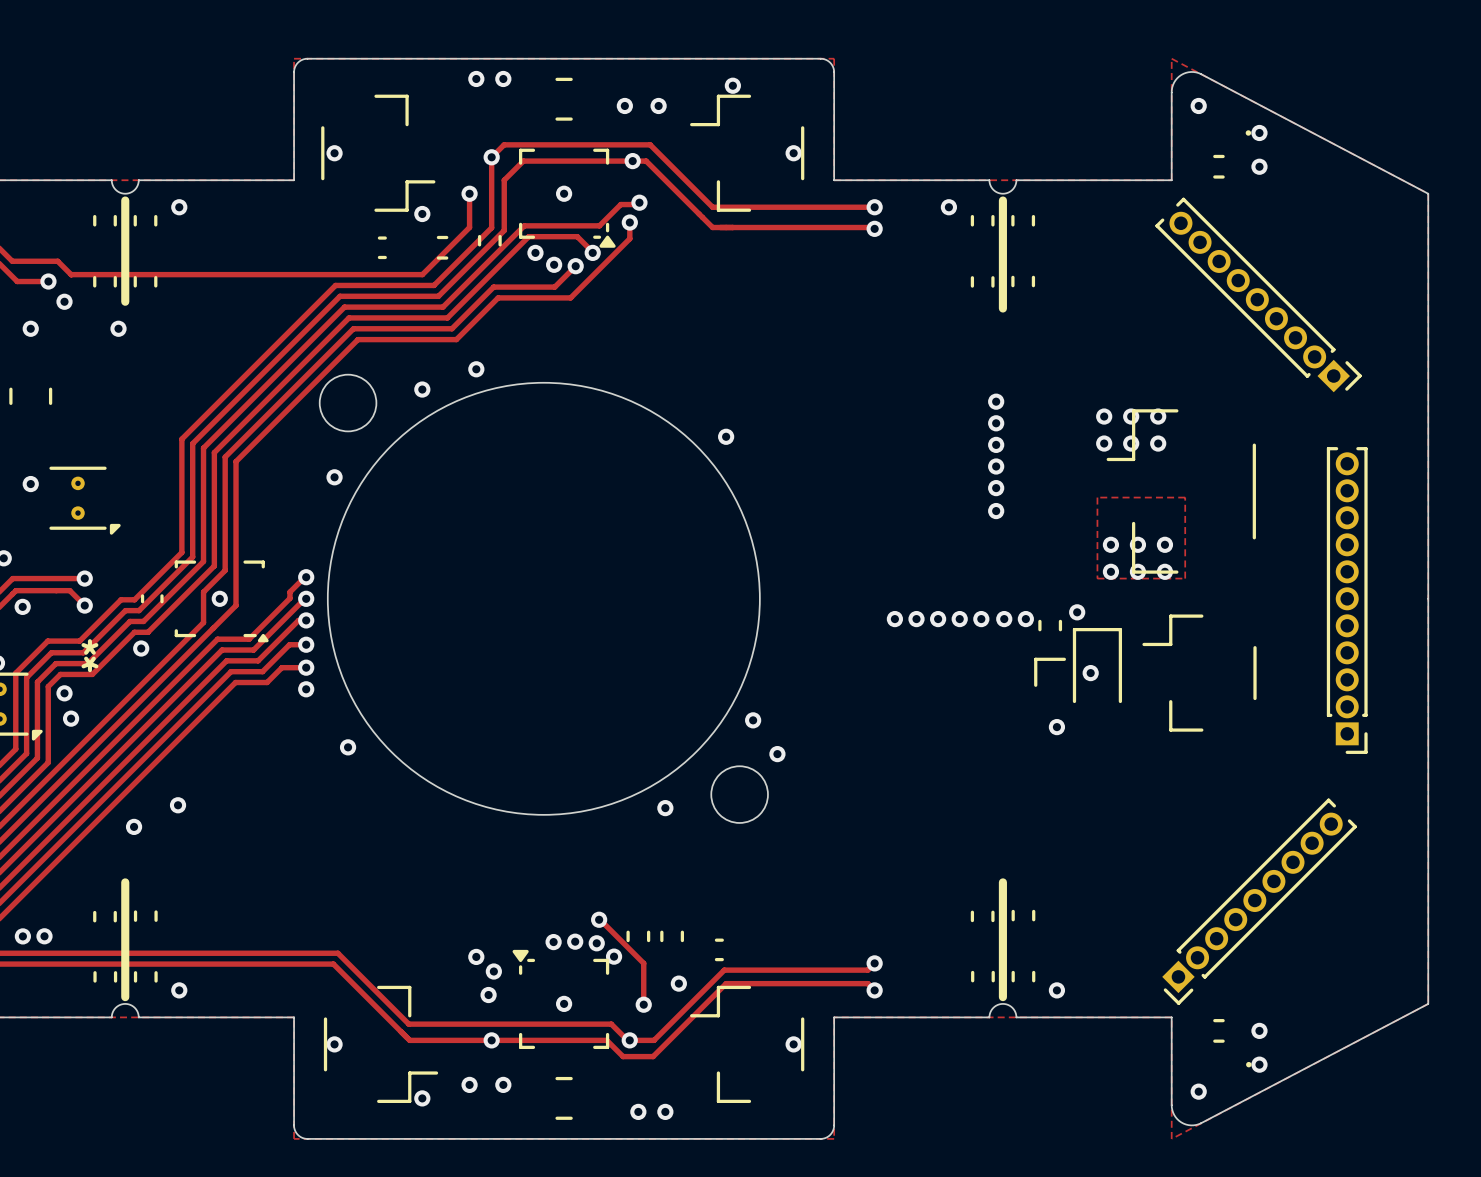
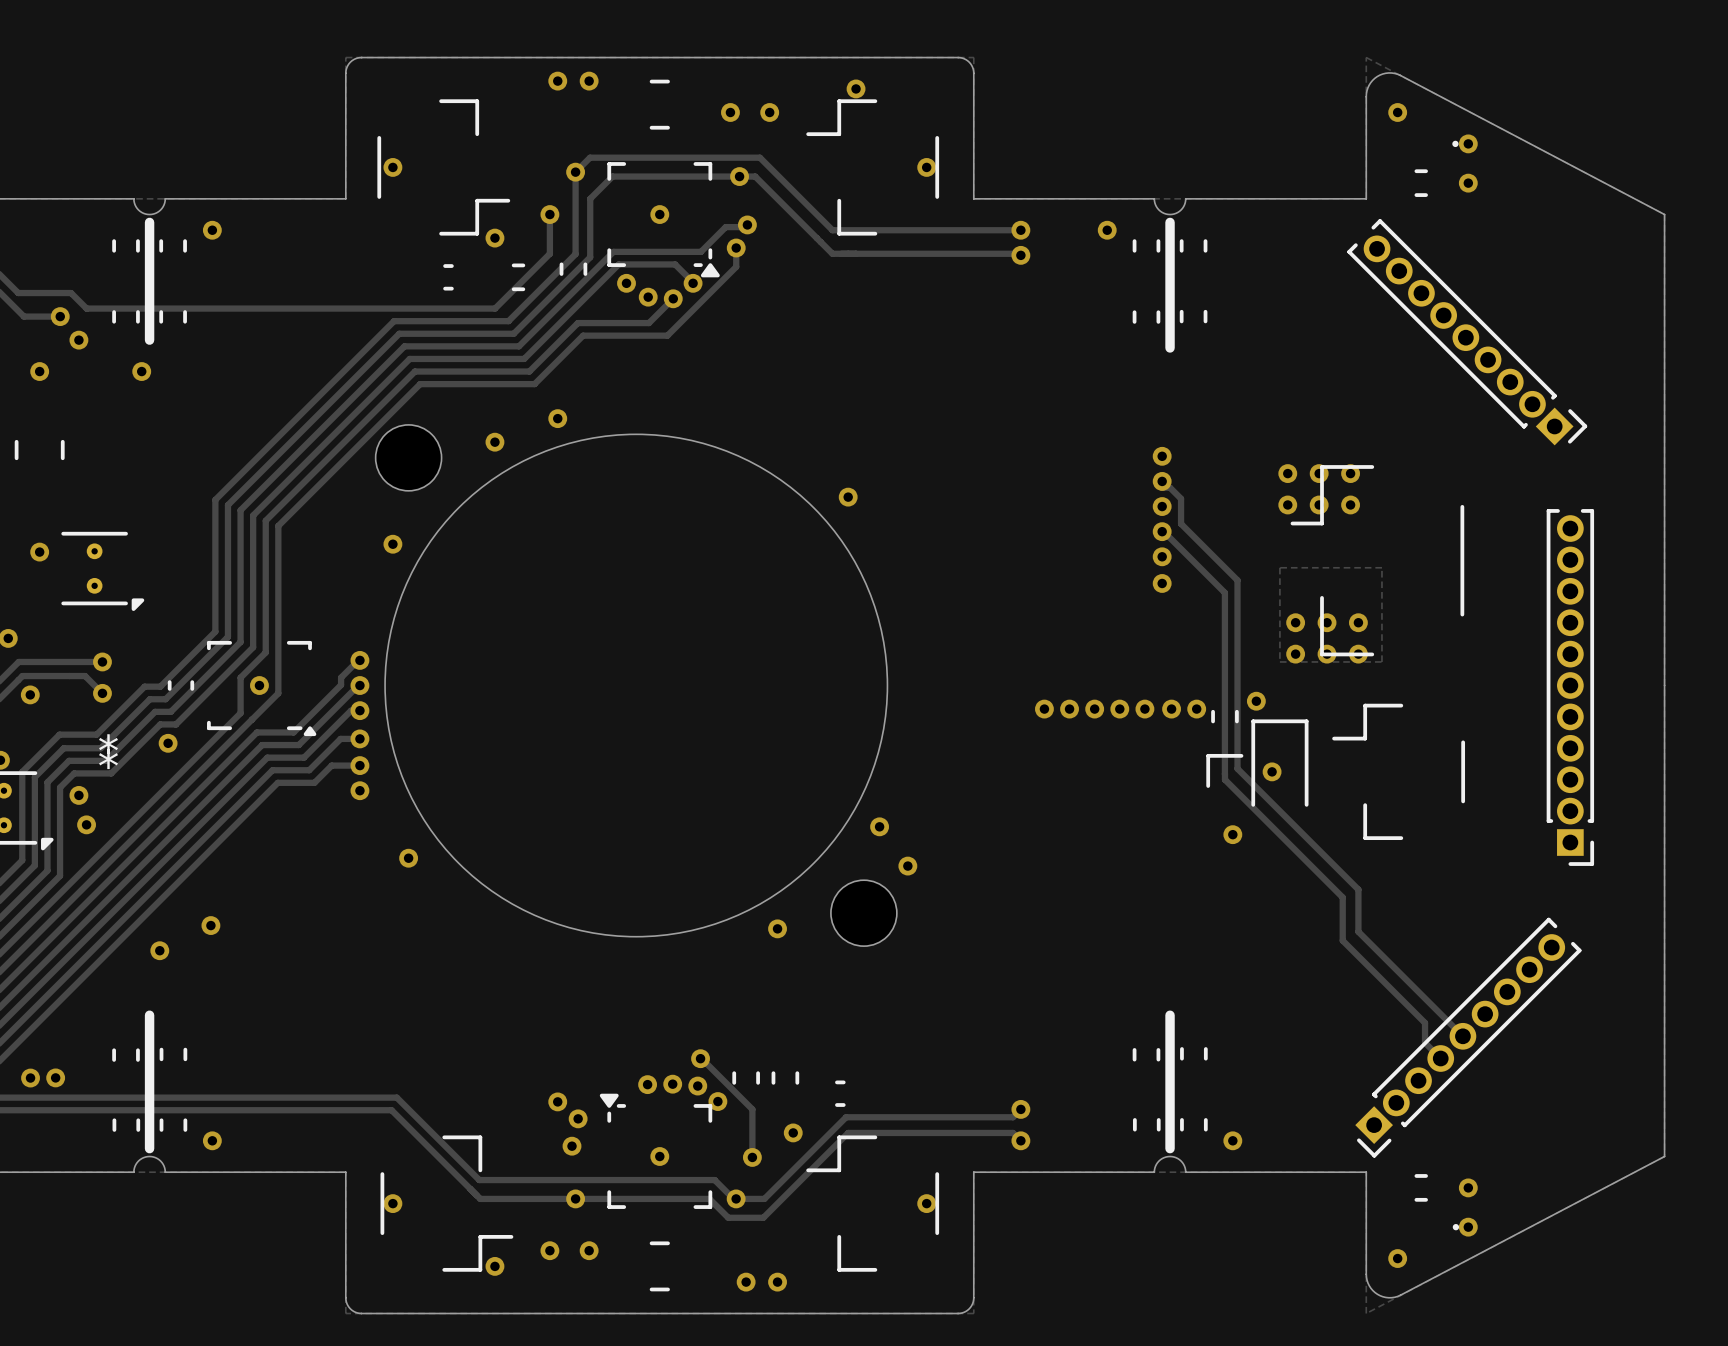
track: none -> (1162, 481) (1162, 487) (1170, 487) (1181, 498) (1181, 523) (1237, 580) (1237, 768) (1358, 889) (1358, 931) (1462, 1036)
track: none -> (1162, 531) (1224, 592) (1224, 779) (1342, 897) (1342, 940) (1425, 1022) (1425, 1042) (1440, 1058)

